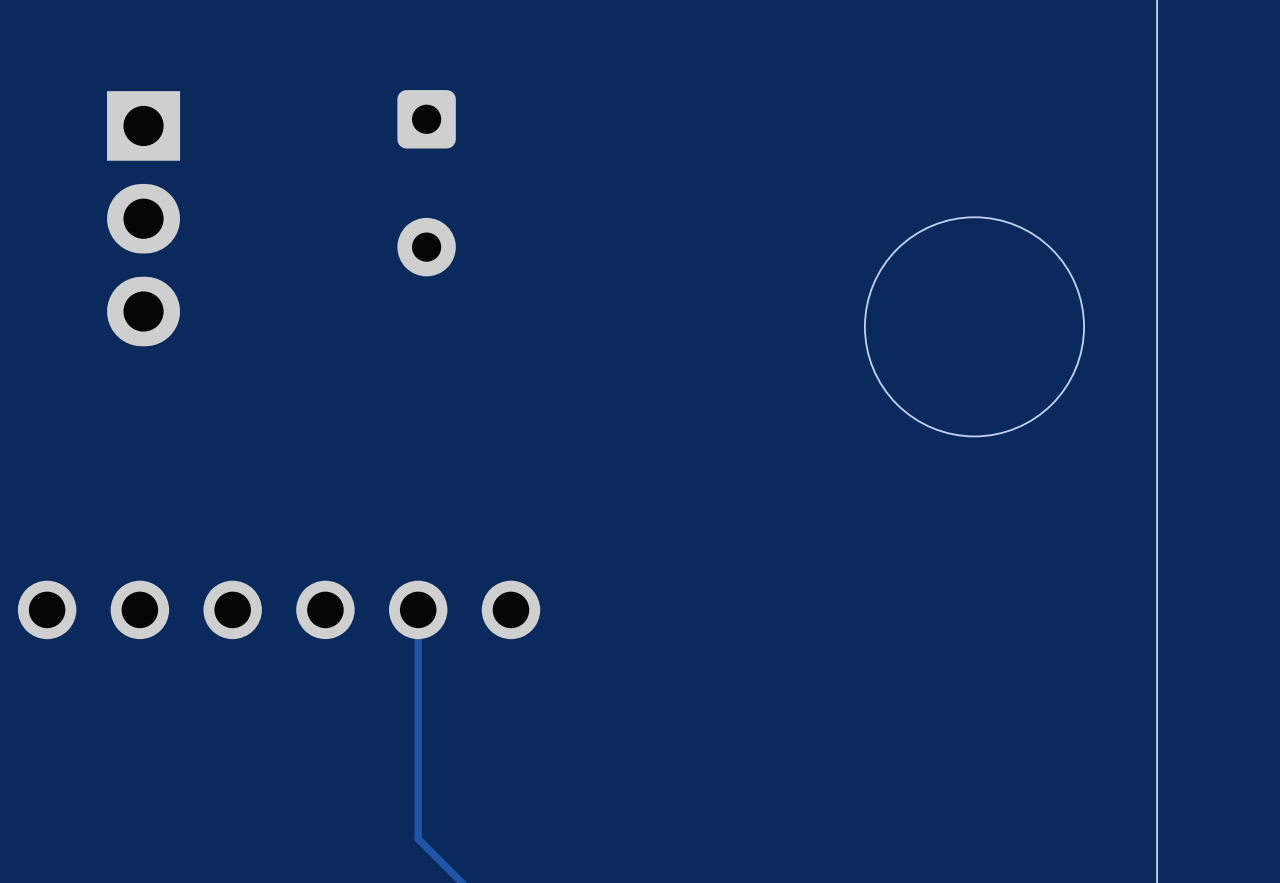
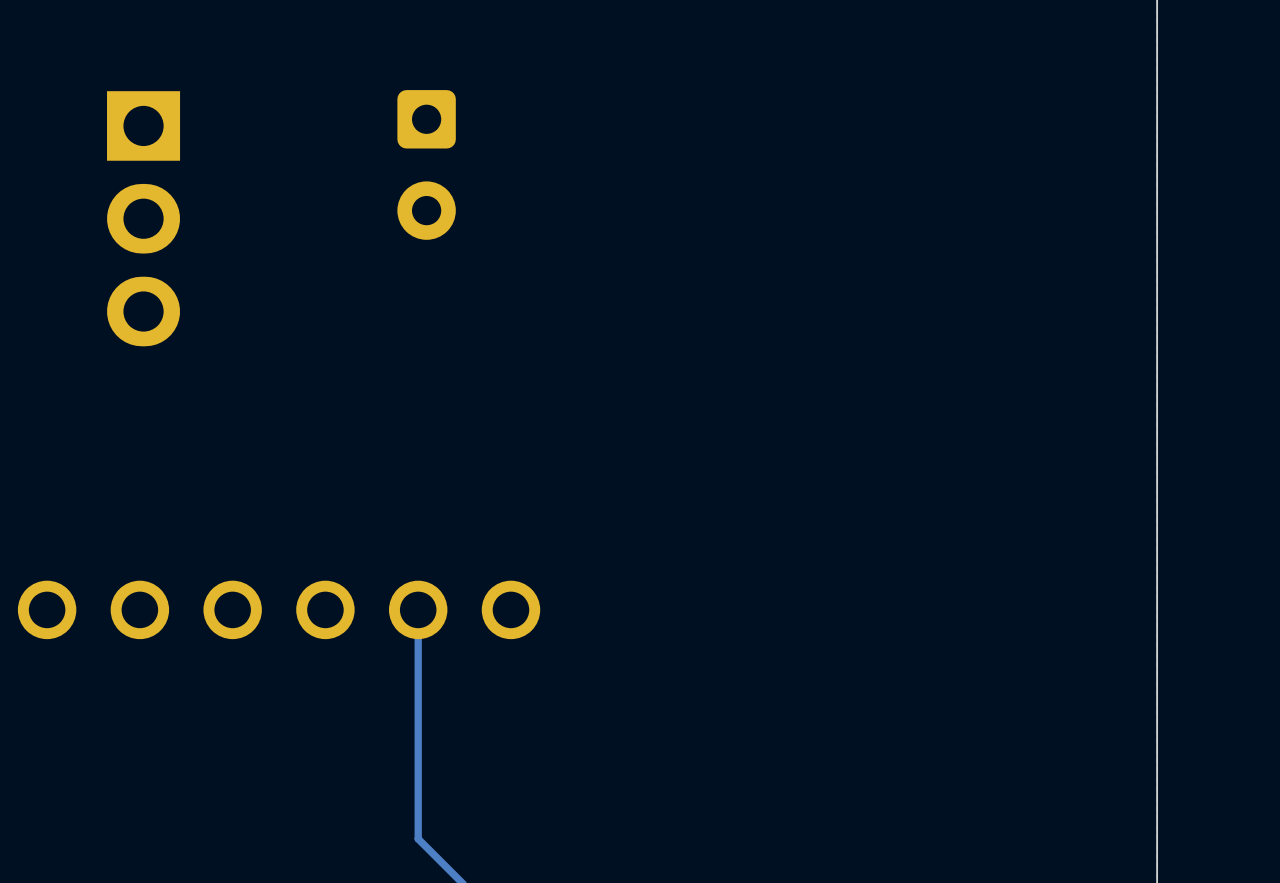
part footprint: [397, 90, 456, 277] -> [397, 90, 456, 240]
round board edge: [863, 216, 1085, 438] -> none

